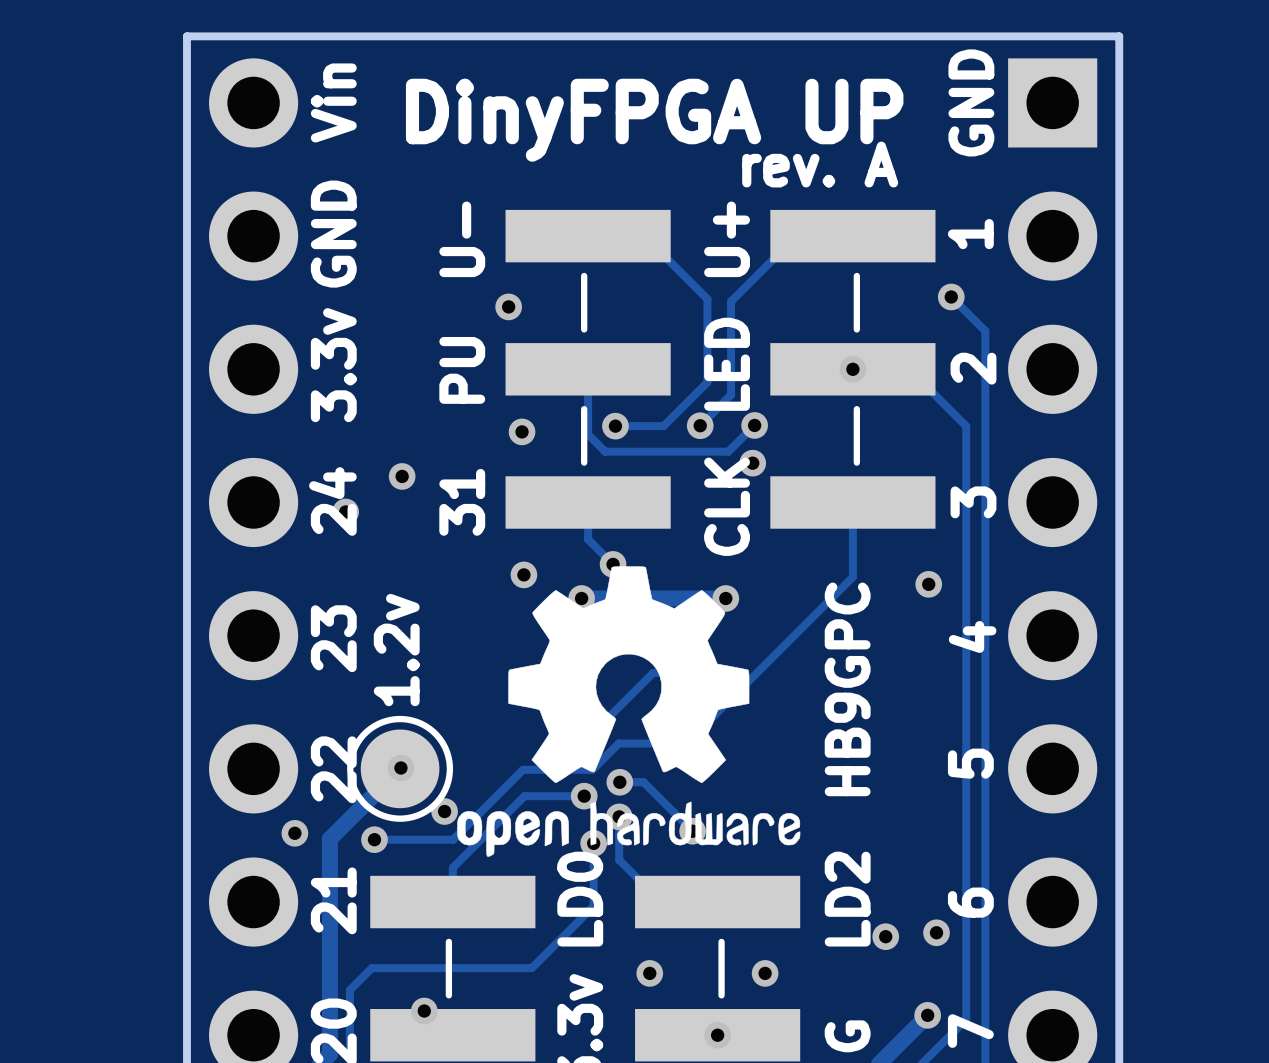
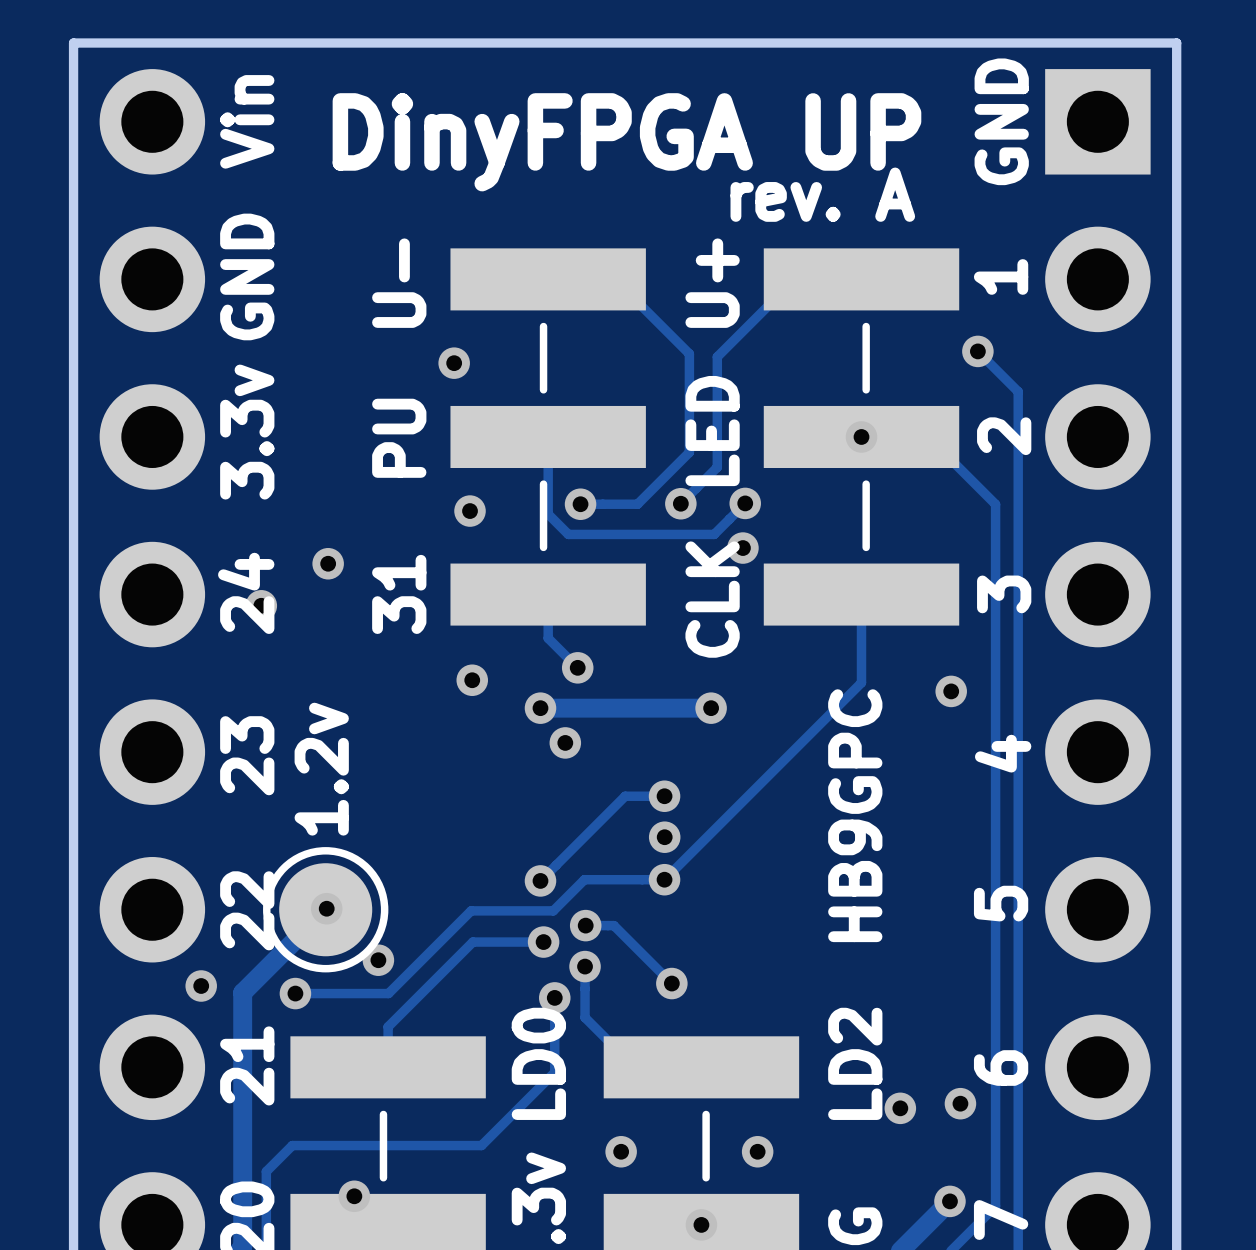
drawing: [457, 566, 801, 857] -> none

